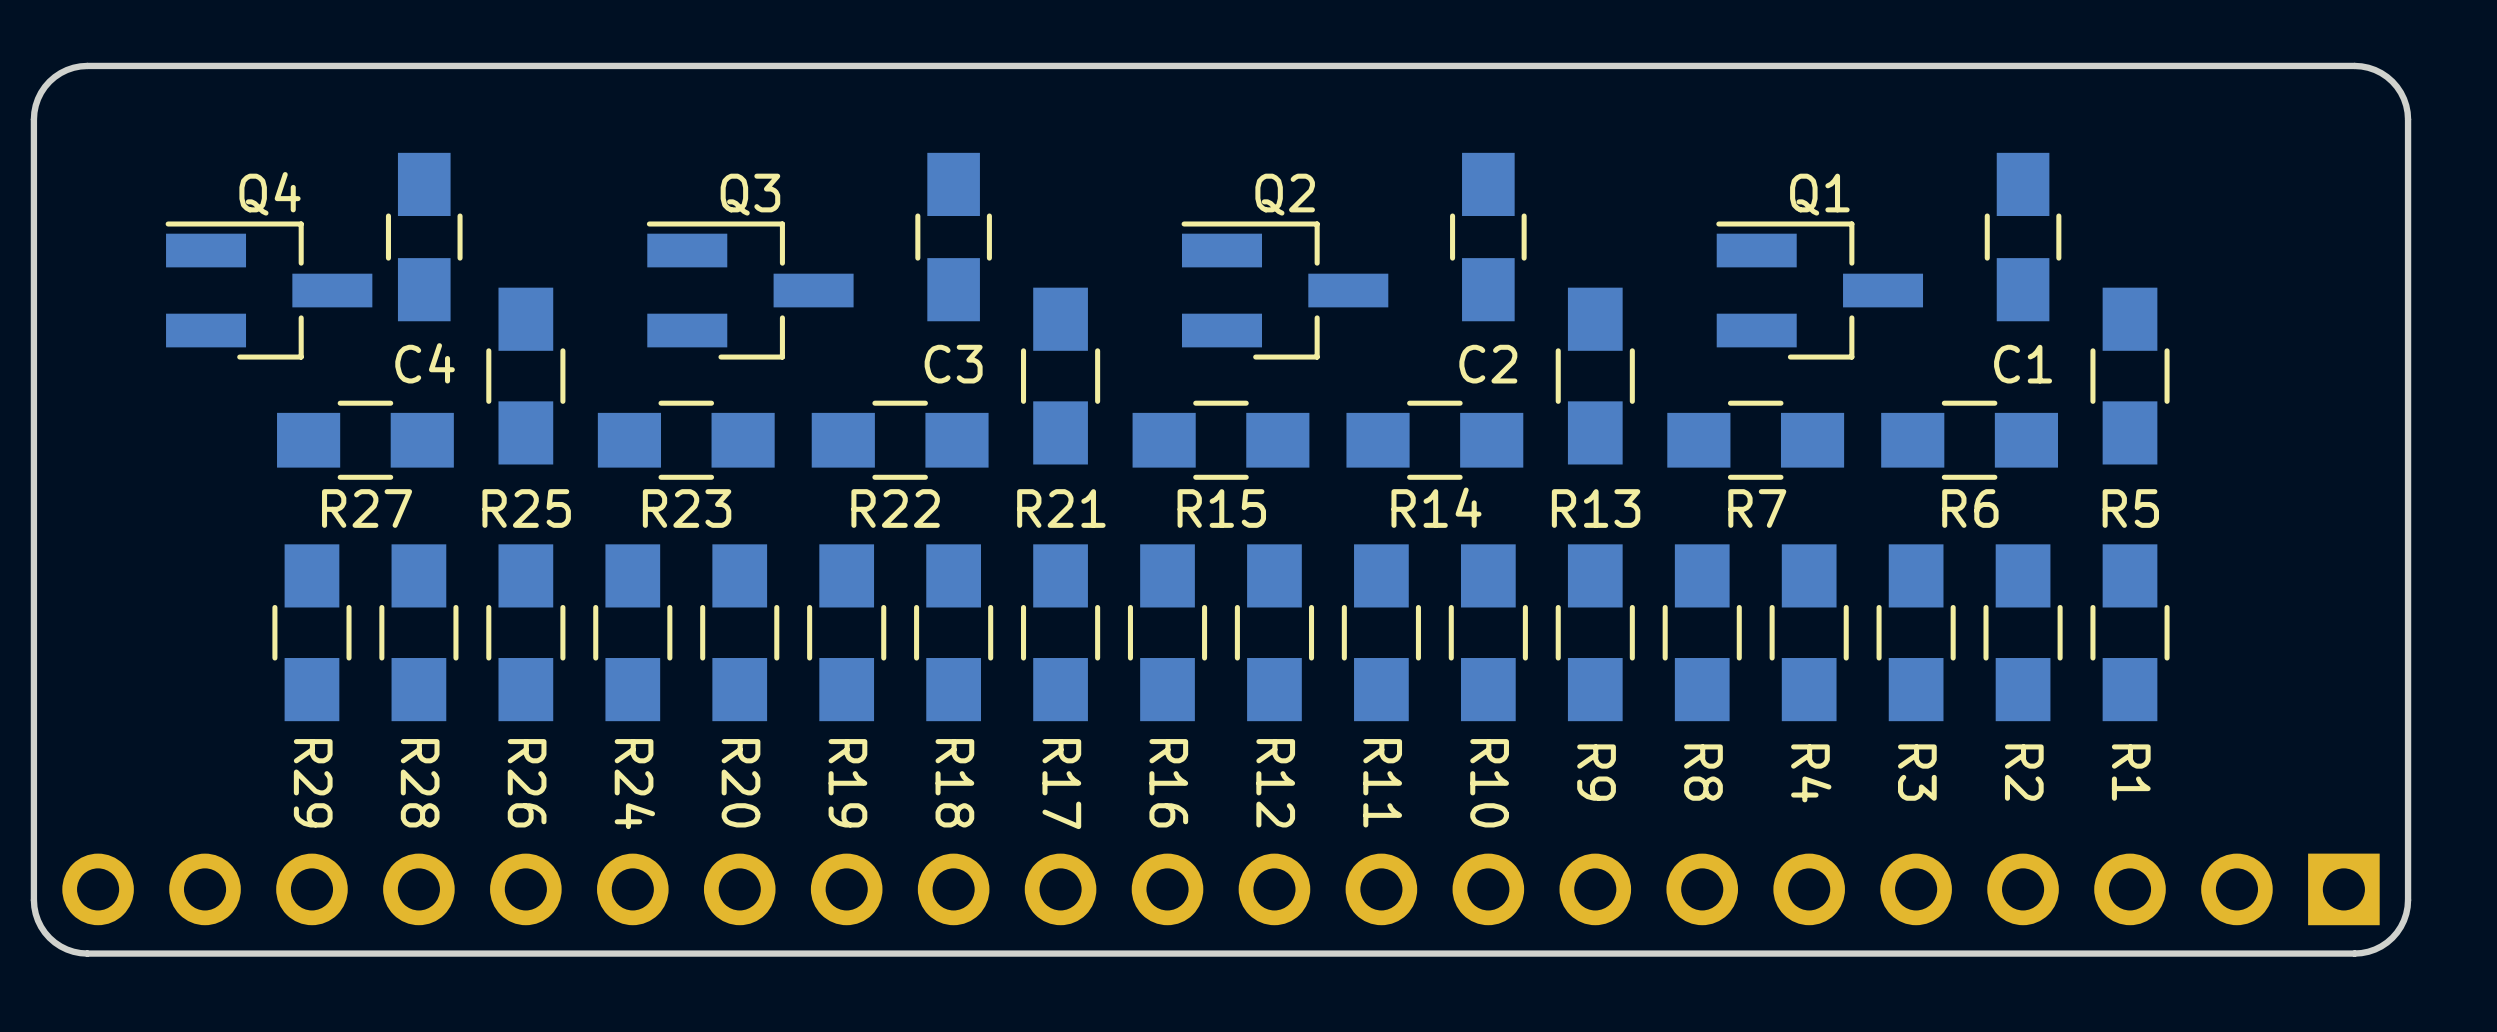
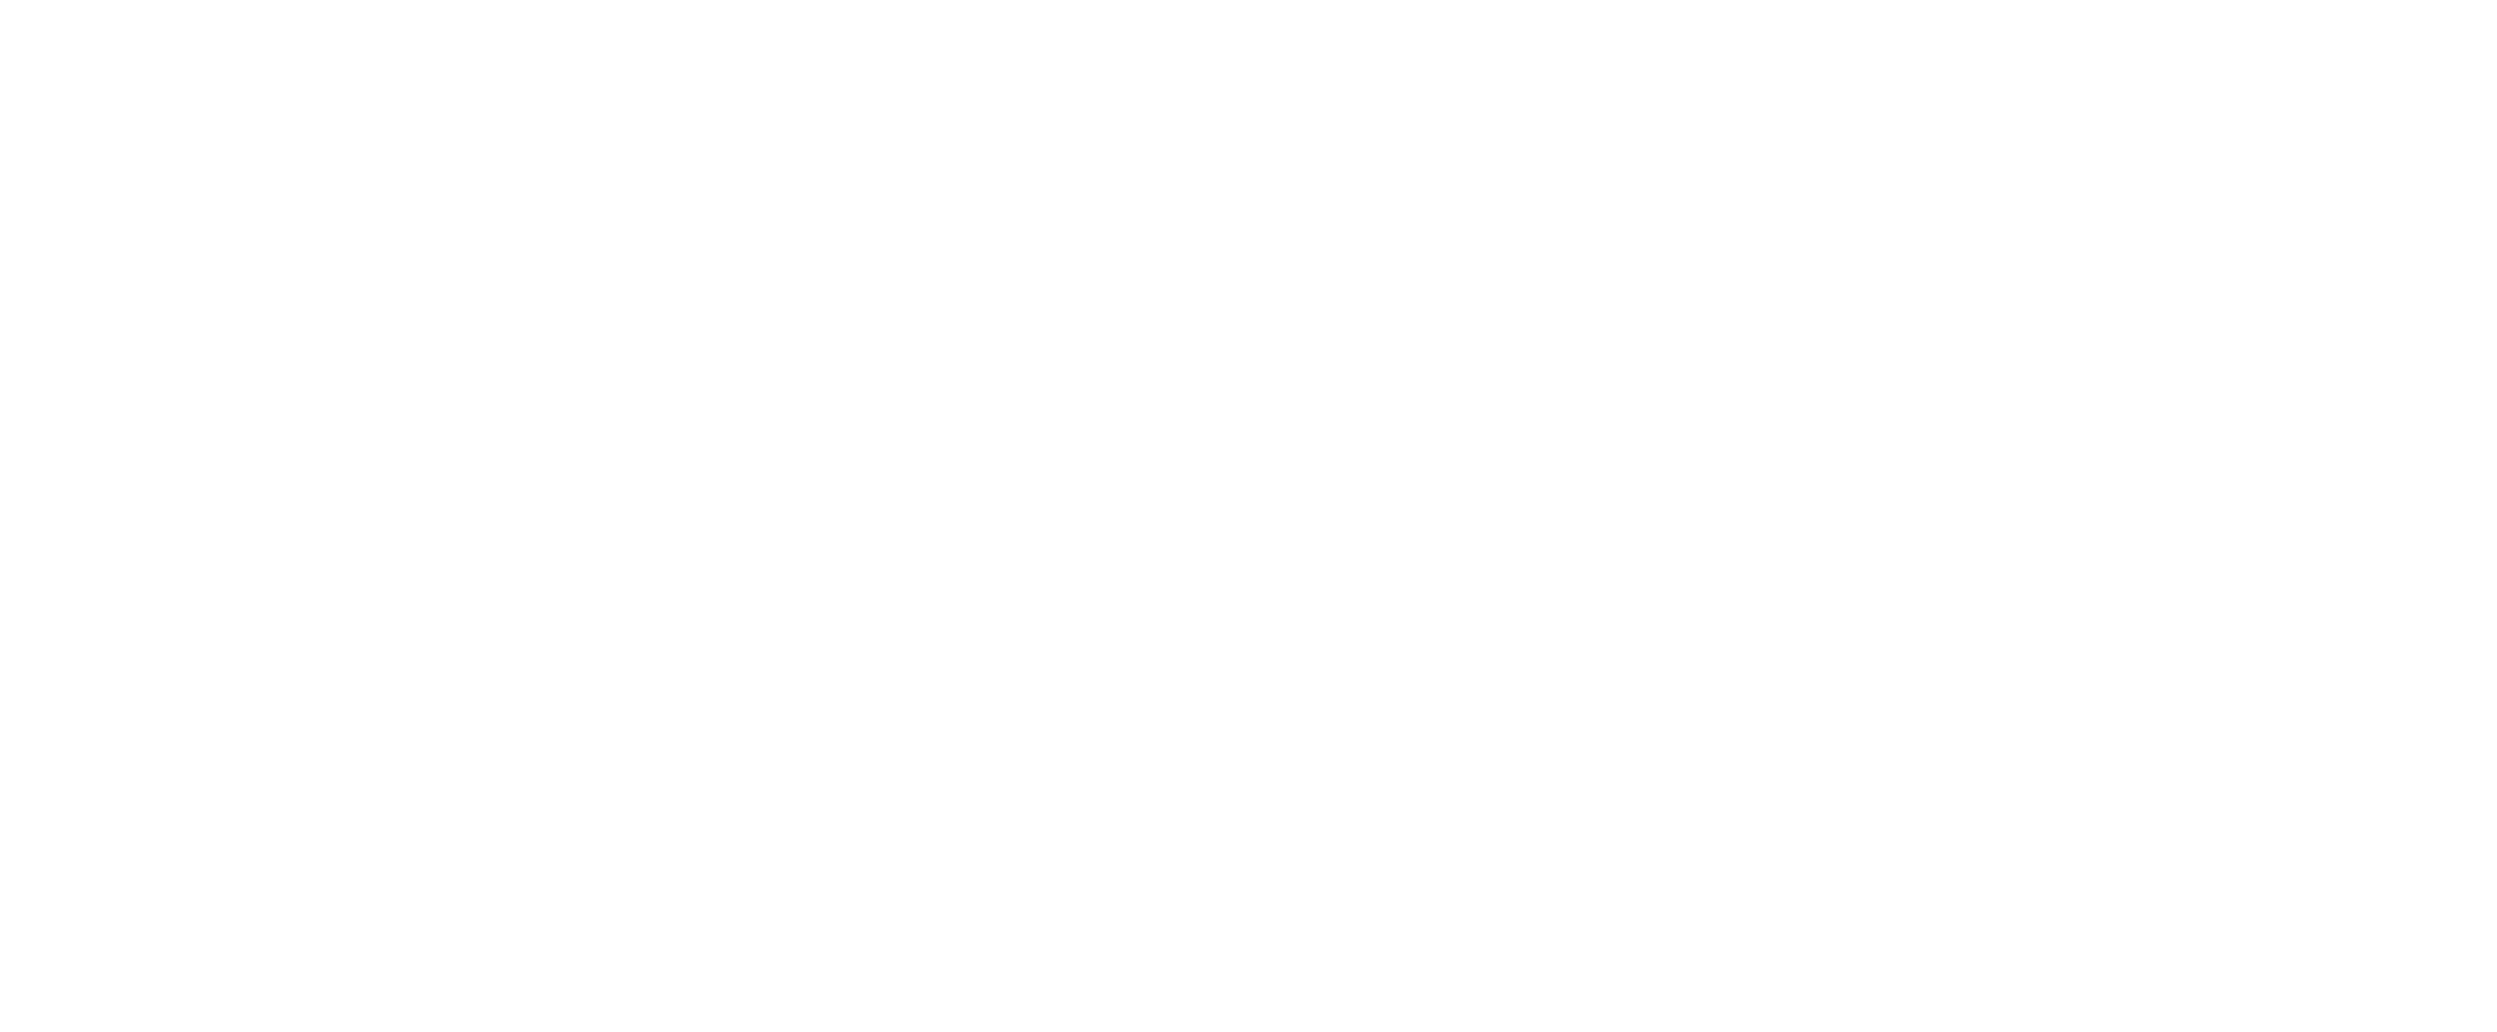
board edge: (2354, 65) (87, 65) (66, 70) (49, 81) (41, 92) (35, 105) (33, 119) (33, 900) (37, 920) (49, 937) (60, 946) (73, 951) (87, 953) (2354, 953) (2375, 949) (2387, 942) (2400, 926) (2406, 913) (2408, 900) (2408, 119) (2403, 98) (2392, 81) (2375, 70) (2354, 65) -> none
C4: (424, 237) -> none
C3: (953, 237) -> none
C2: (1488, 237) -> none
C1: (2023, 237) -> none
Q4: (268, 290) -> none
Q3: (750, 290) -> none
Q2: (1284, 290) -> none
Q1: (1819, 290) -> none
R25: (525, 376) -> none
R21: (1060, 376) -> none
R13: (1595, 376) -> none
R5: (2130, 376) -> none
R27: (365, 440) -> none
R23: (686, 440) -> none
R22: (900, 440) -> none
R15: (1220, 440) -> none
R14: (1434, 440) -> none
R7: (1755, 440) -> none
R6: (1969, 440) -> none
R29: (311, 632) -> none
R28: (418, 632) -> none
R26: (525, 632) -> none
R24: (632, 632) -> none
R20: (739, 632) -> none
R19: (846, 632) -> none
R18: (953, 632) -> none
R17: (1060, 632) -> none
R16: (1167, 632) -> none
R12: (1274, 632) -> none
R11: (1381, 632) -> none
R10: (1488, 632) -> none
R9: (1595, 632) -> none
R8: (1702, 632) -> none
R4: (1809, 632) -> none
R3: (1916, 632) -> none
R2: (2023, 632) -> none
R1: (2130, 632) -> none
part: (1220, 889) -> none

